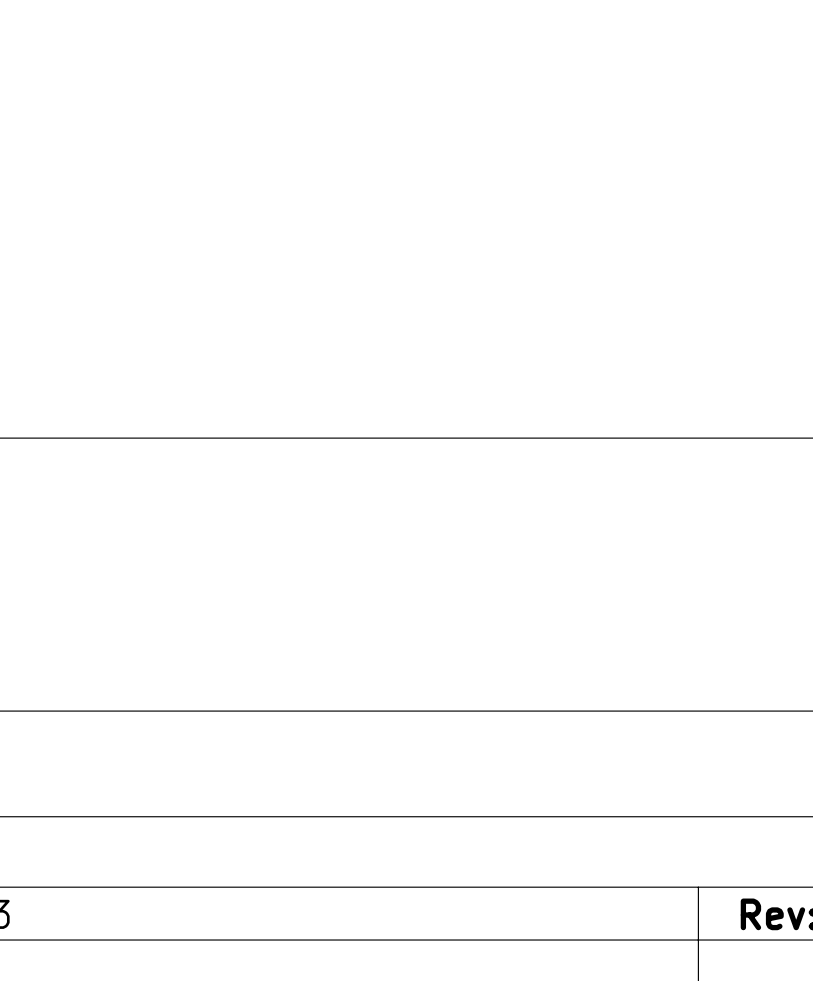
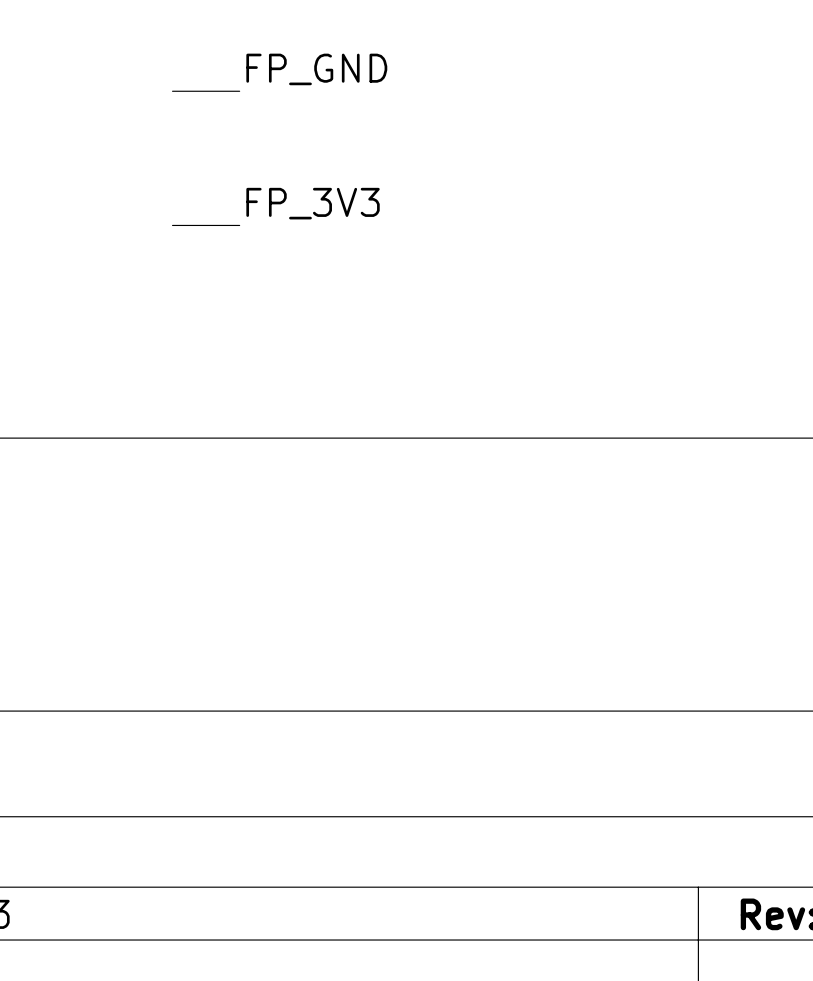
label: none -> FP_GND (316, 69)
wire: none -> (172, 91) (239, 91)
label: none -> FP_3V3 (313, 203)
wire: none -> (172, 225) (239, 225)

